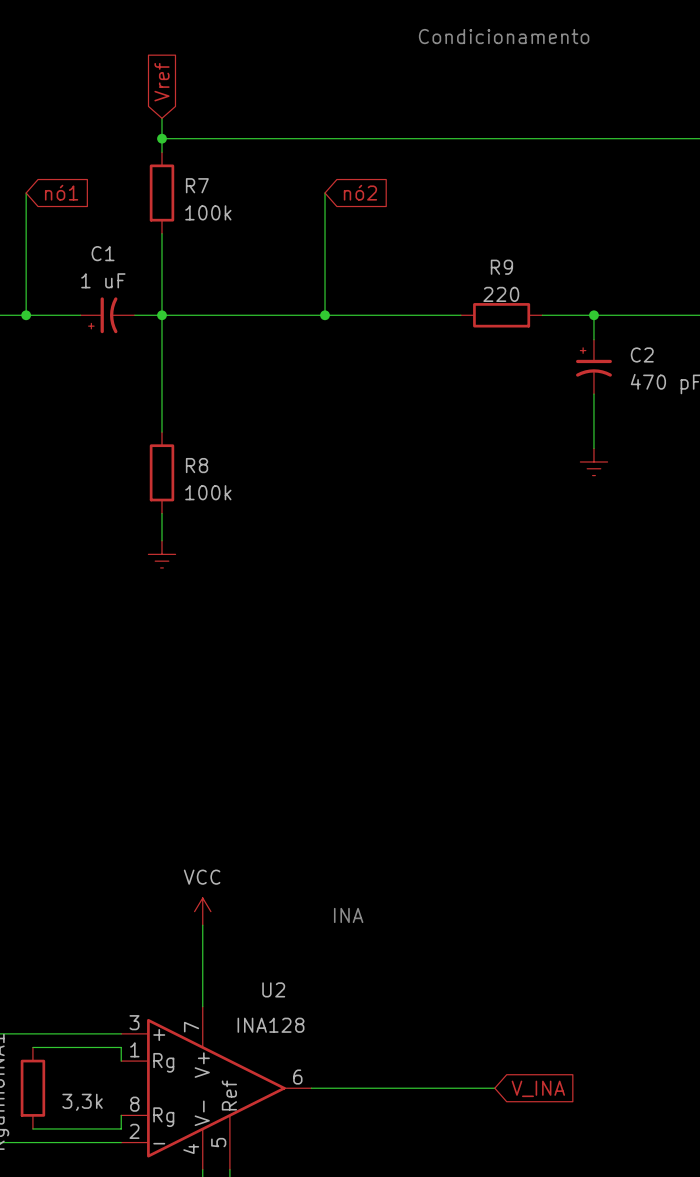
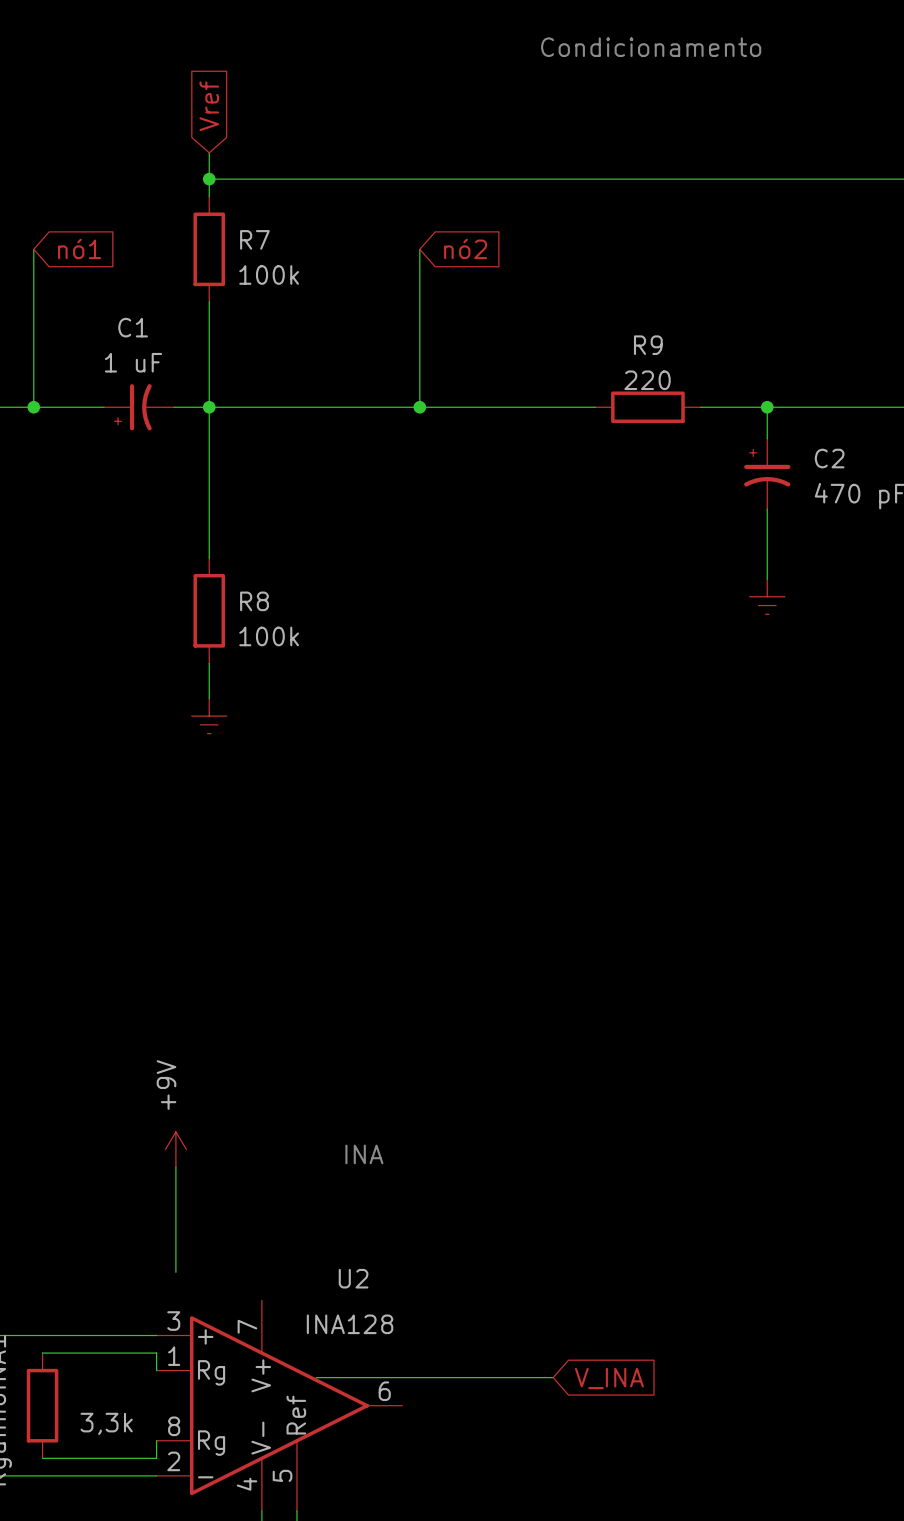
power symbol: none -> +9V (175, 1149)
power symbol: VCC (202, 911) -> none
text position: INA (348, 915) -> INA (364, 1154)
wire: (202, 925) (202, 1006) -> (175, 1167) (175, 1272)
wire: (311, 1088) (494, 1088) -> (316, 1377) (553, 1377)
global label position: V_INA (538, 1088) -> V_INA (609, 1378)

